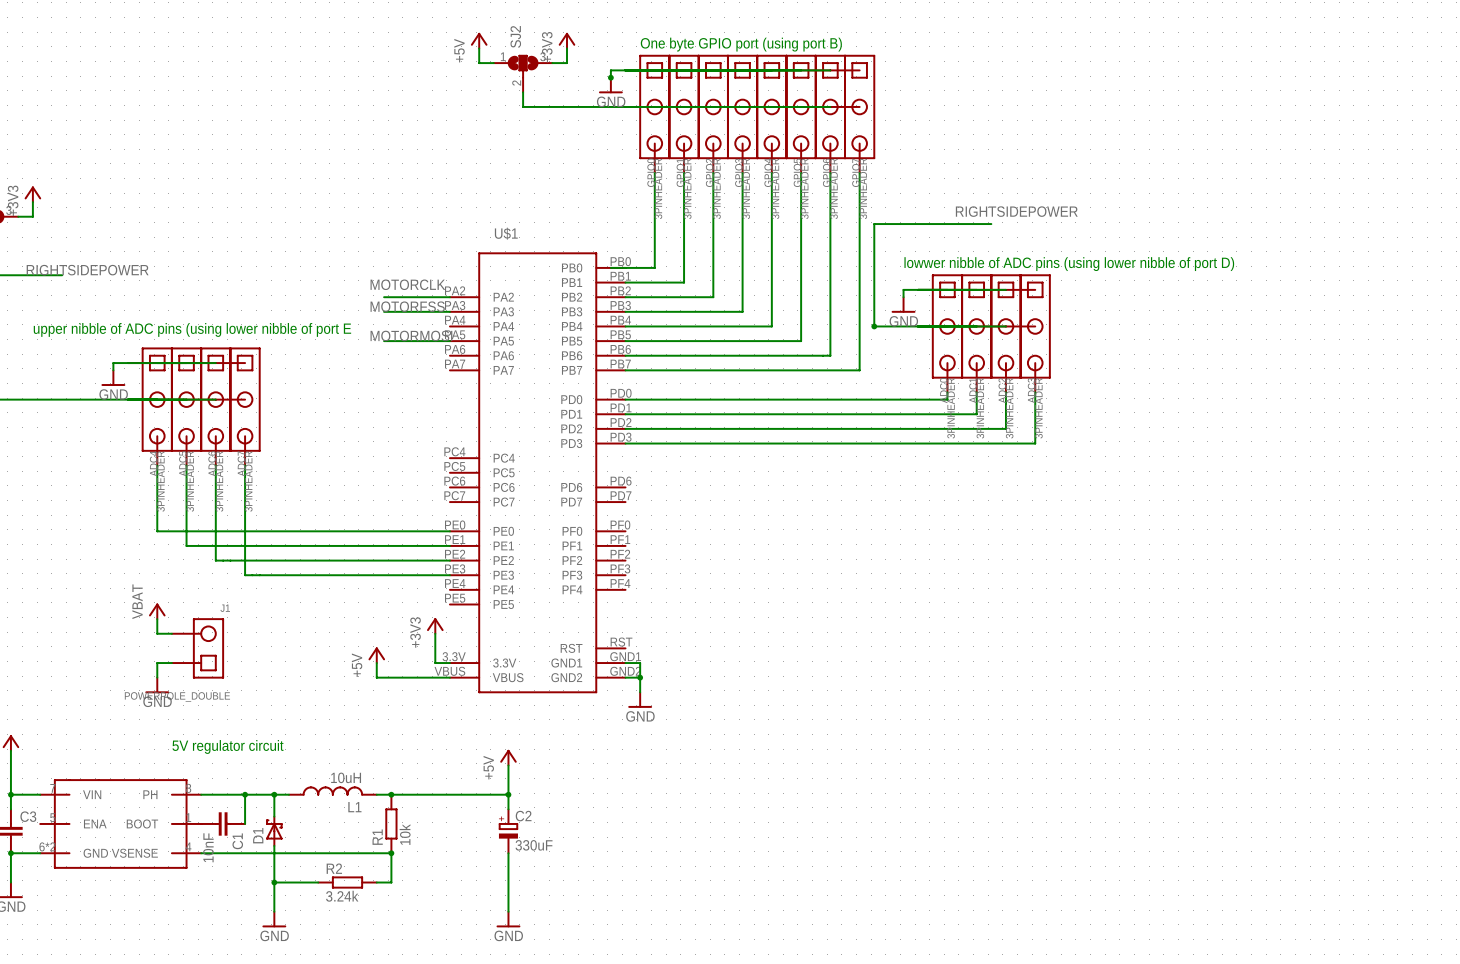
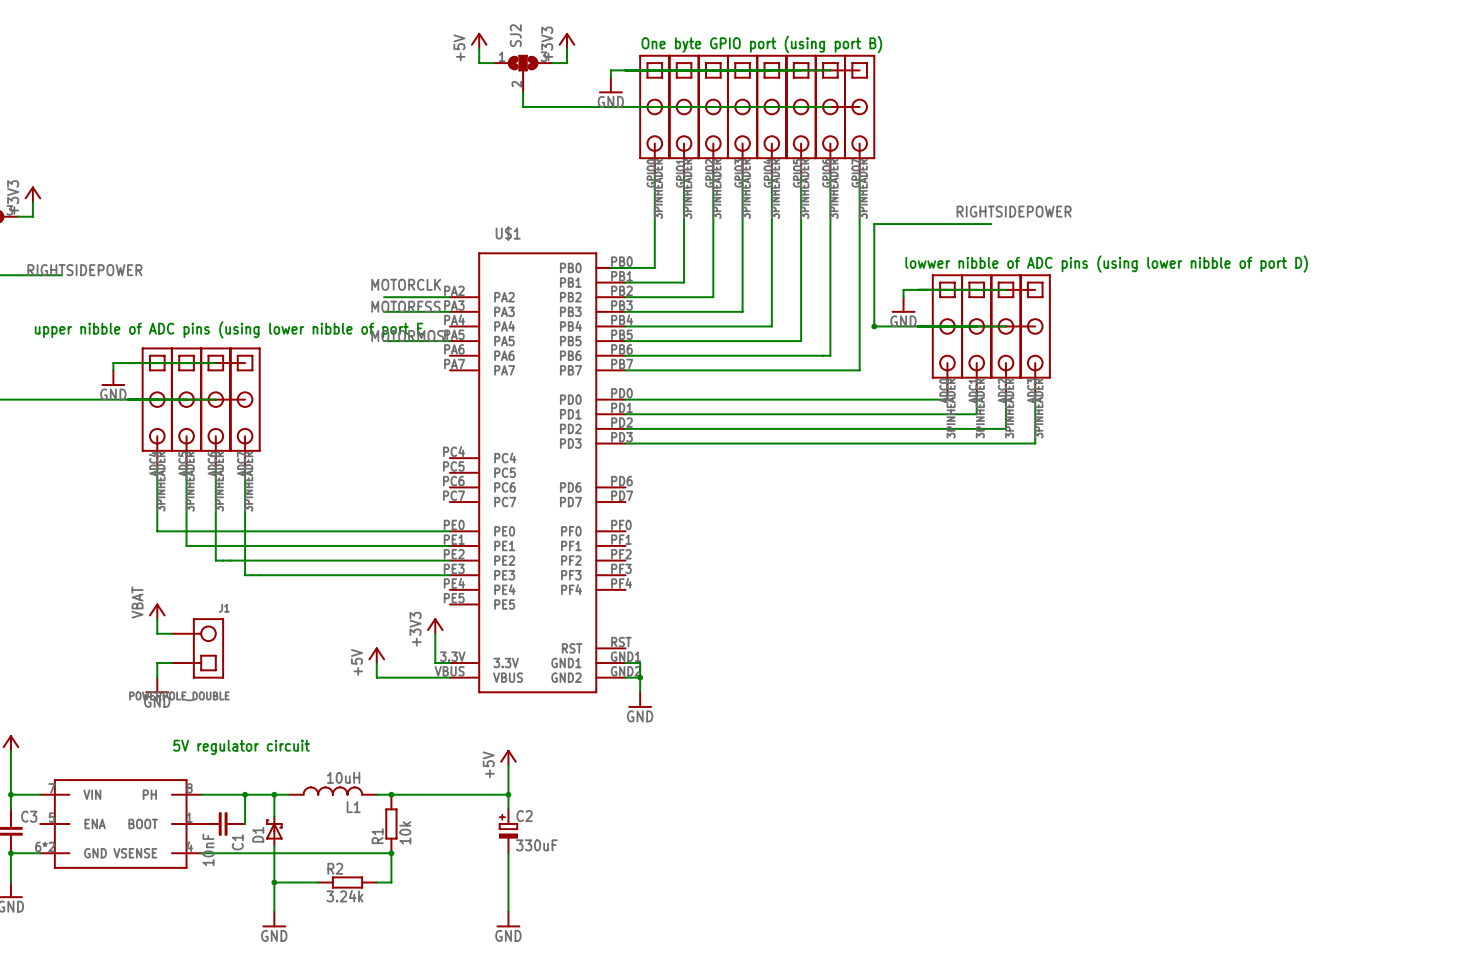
junction: (610, 77) -> none

